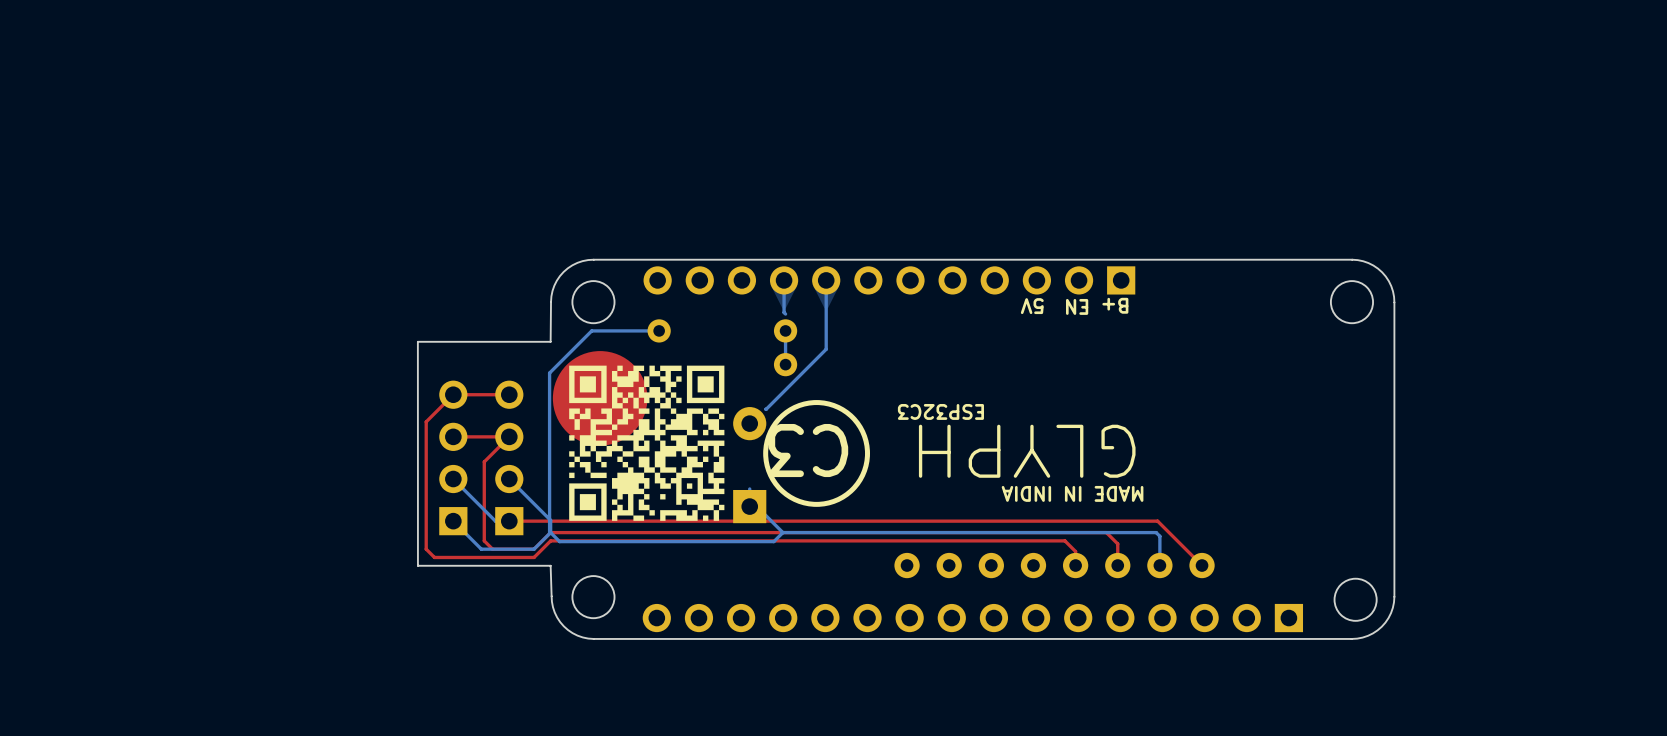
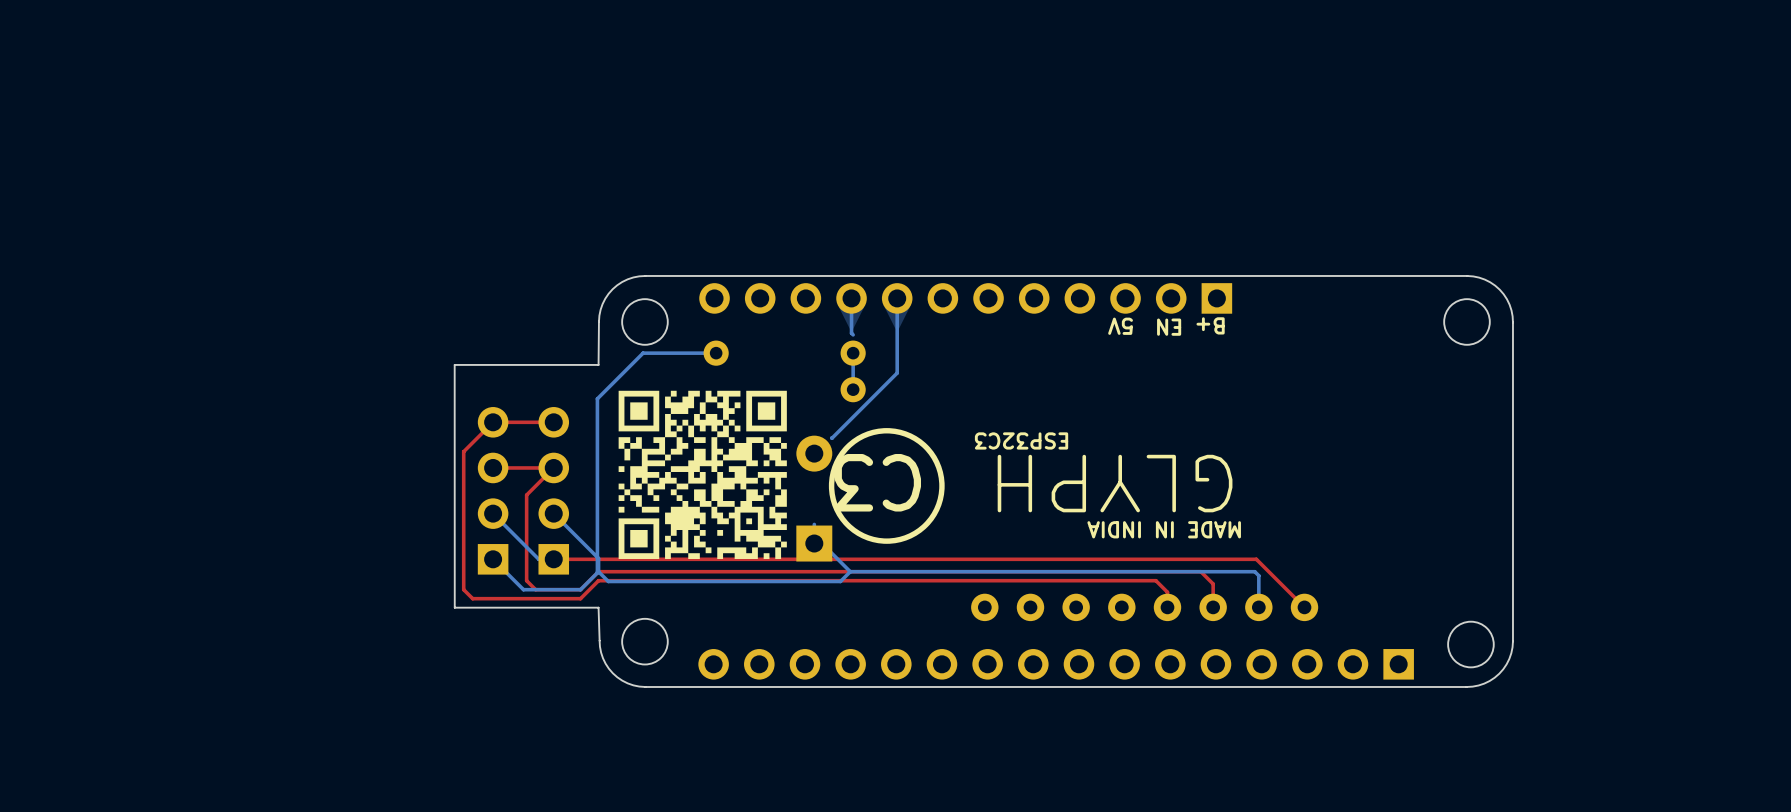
part: (600, 398) -> none

